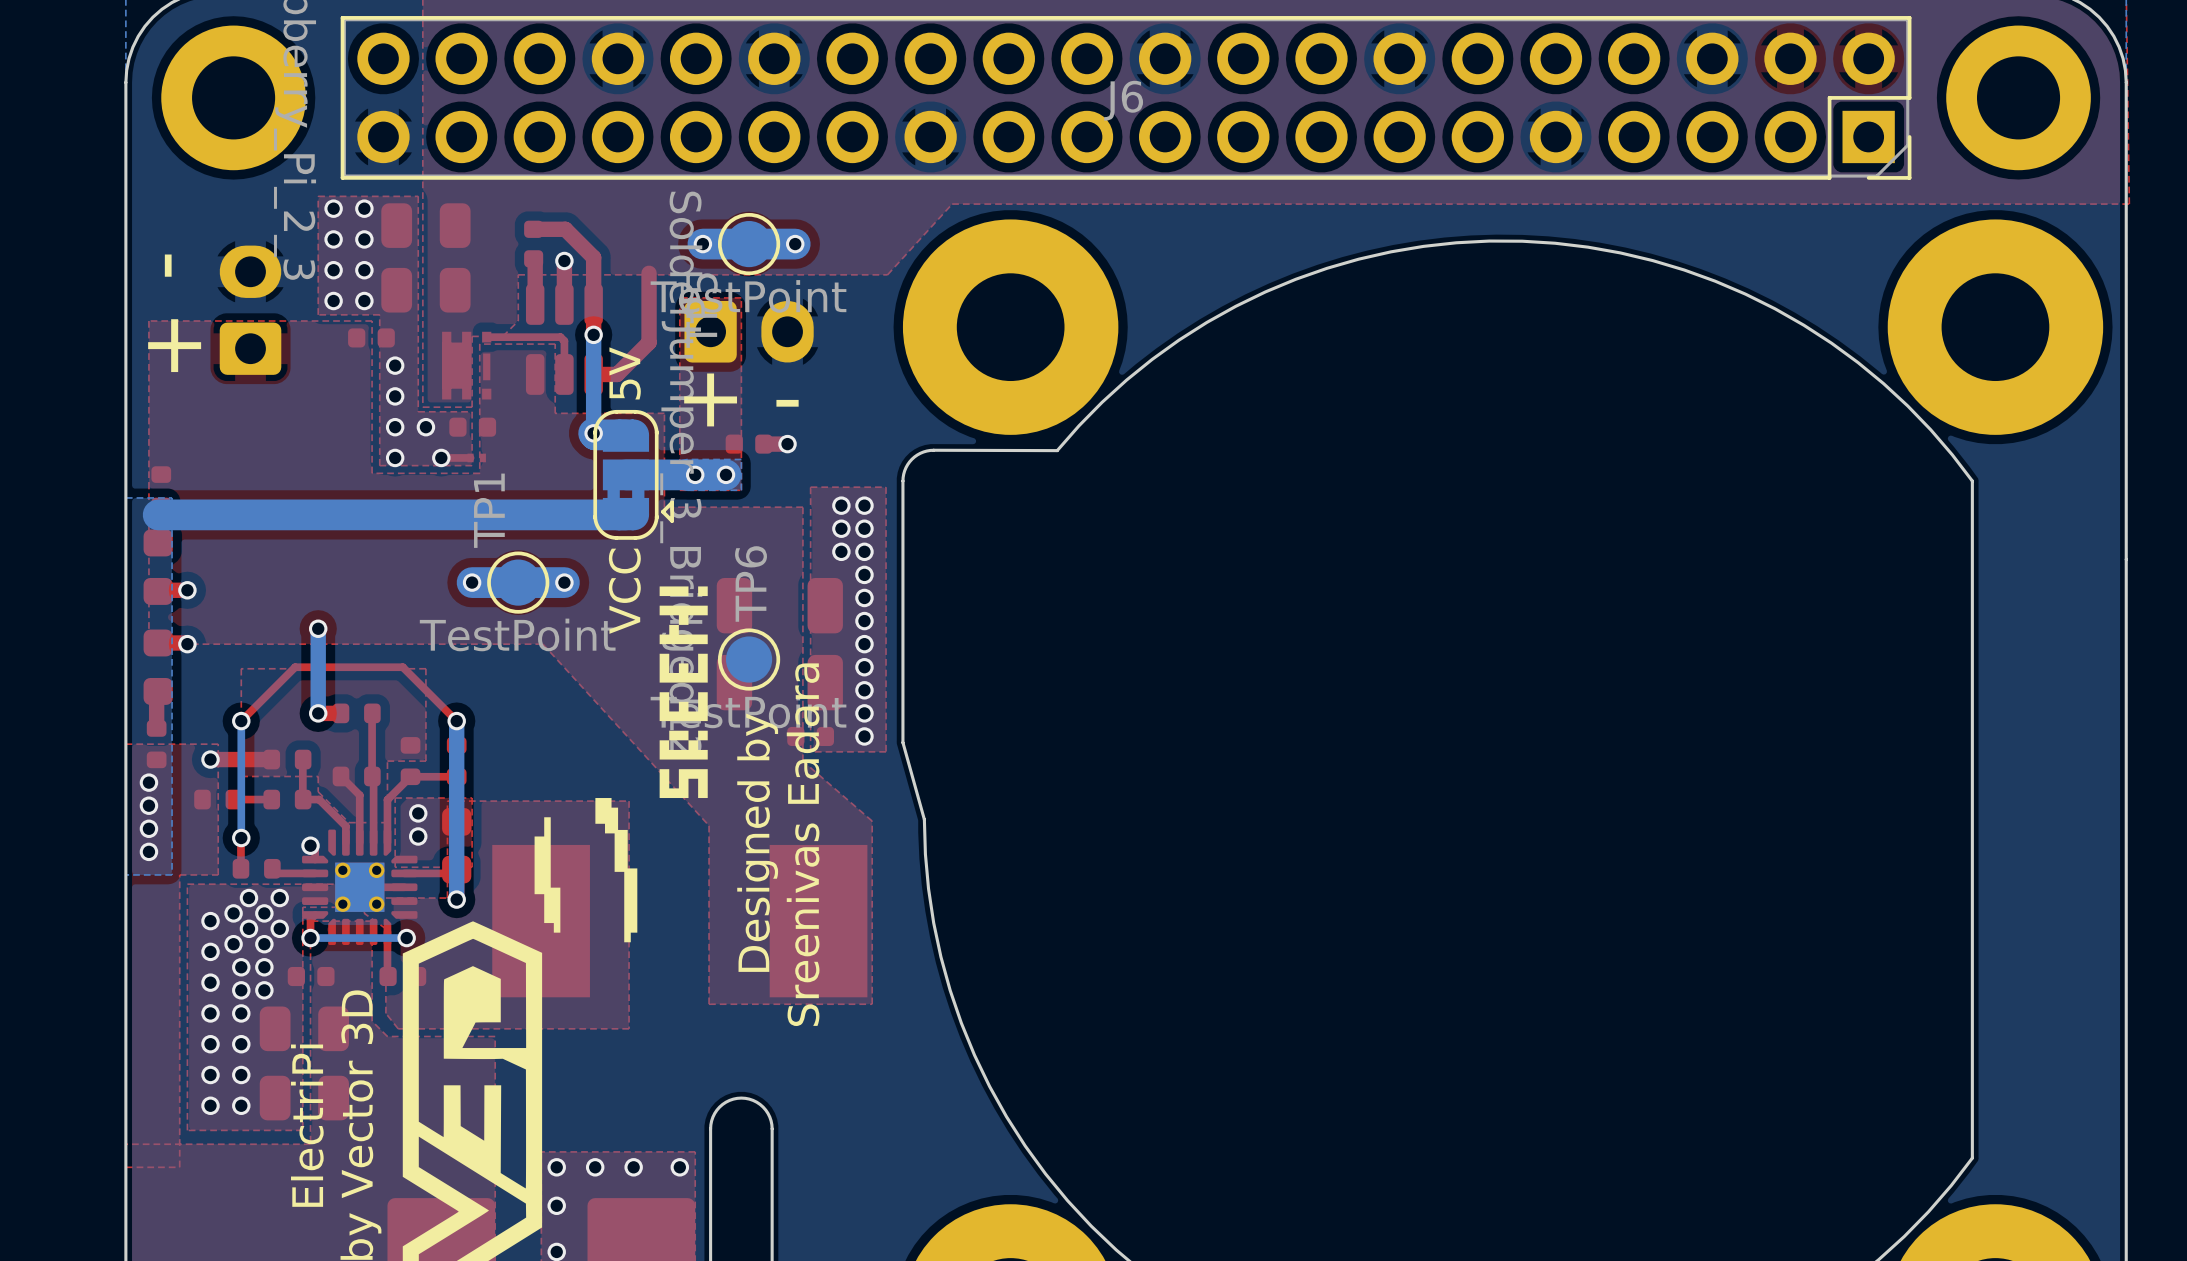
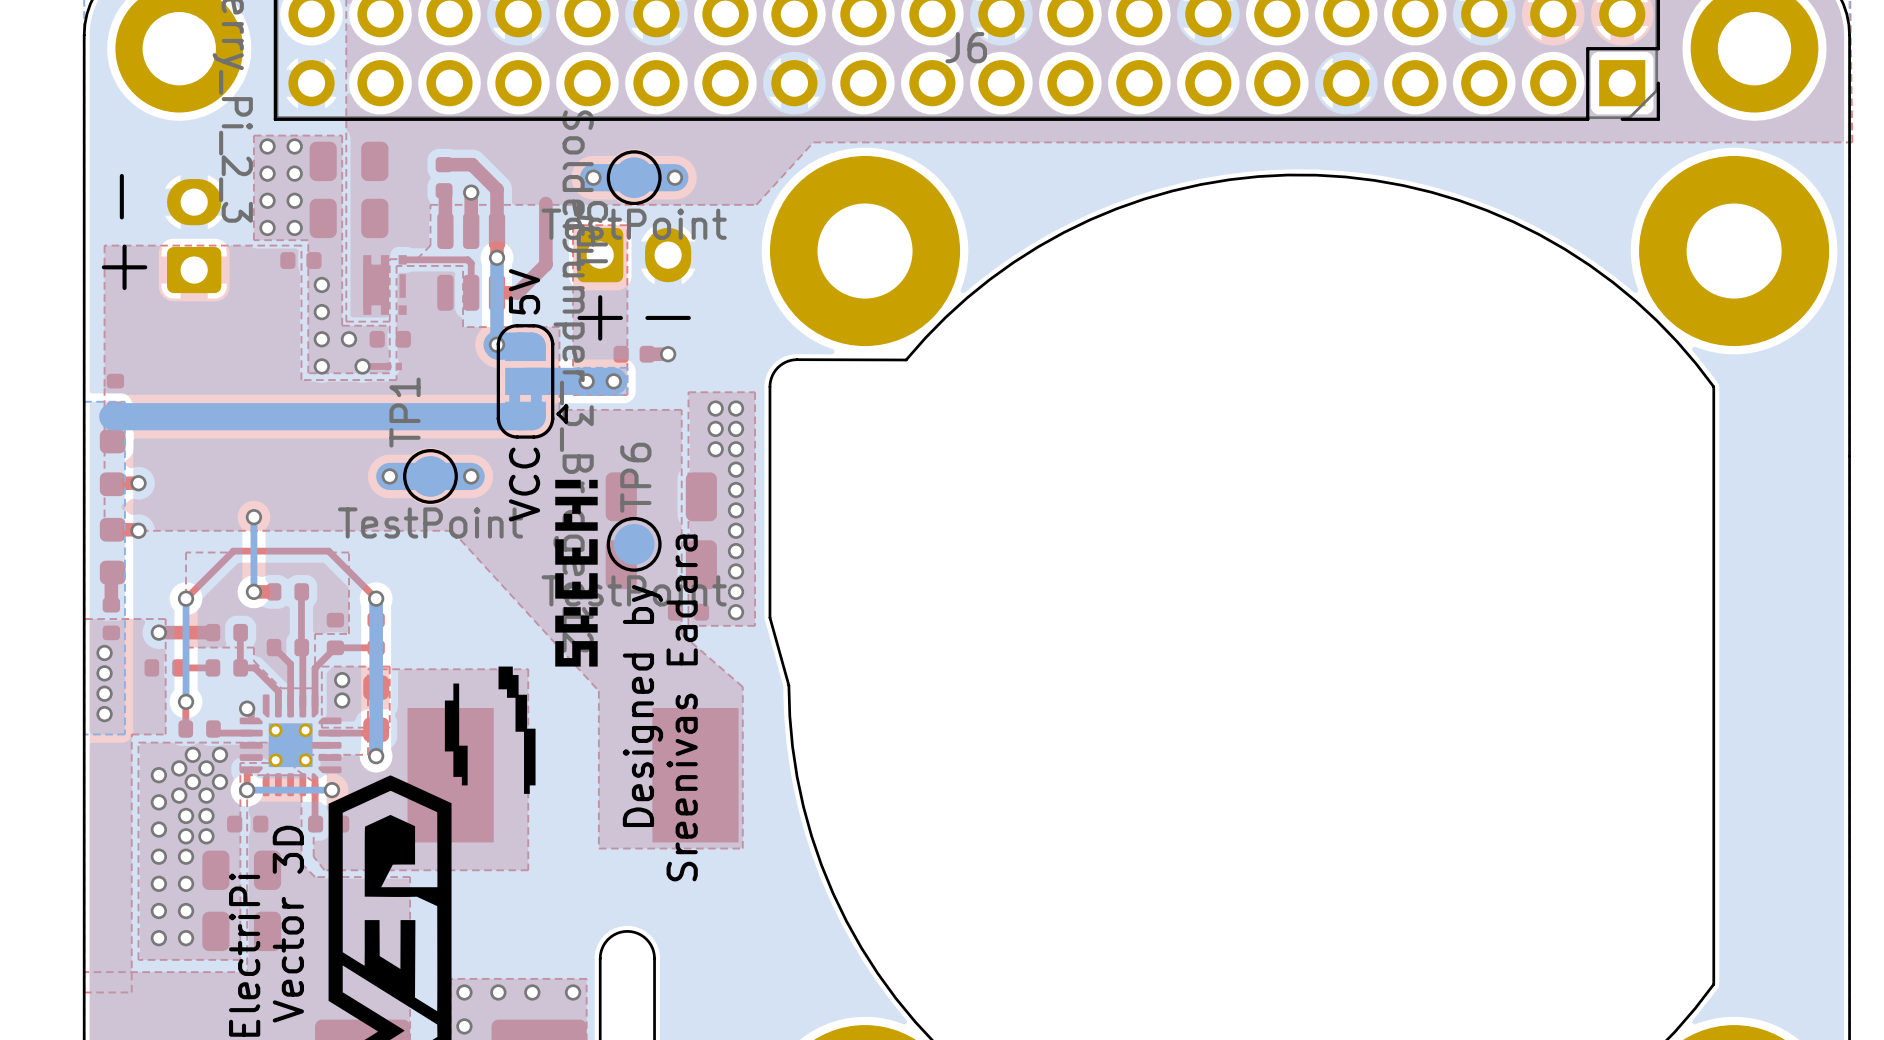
bottom track width: thick (318, 628) (318, 713) -> thin (253, 517) (253, 591)

